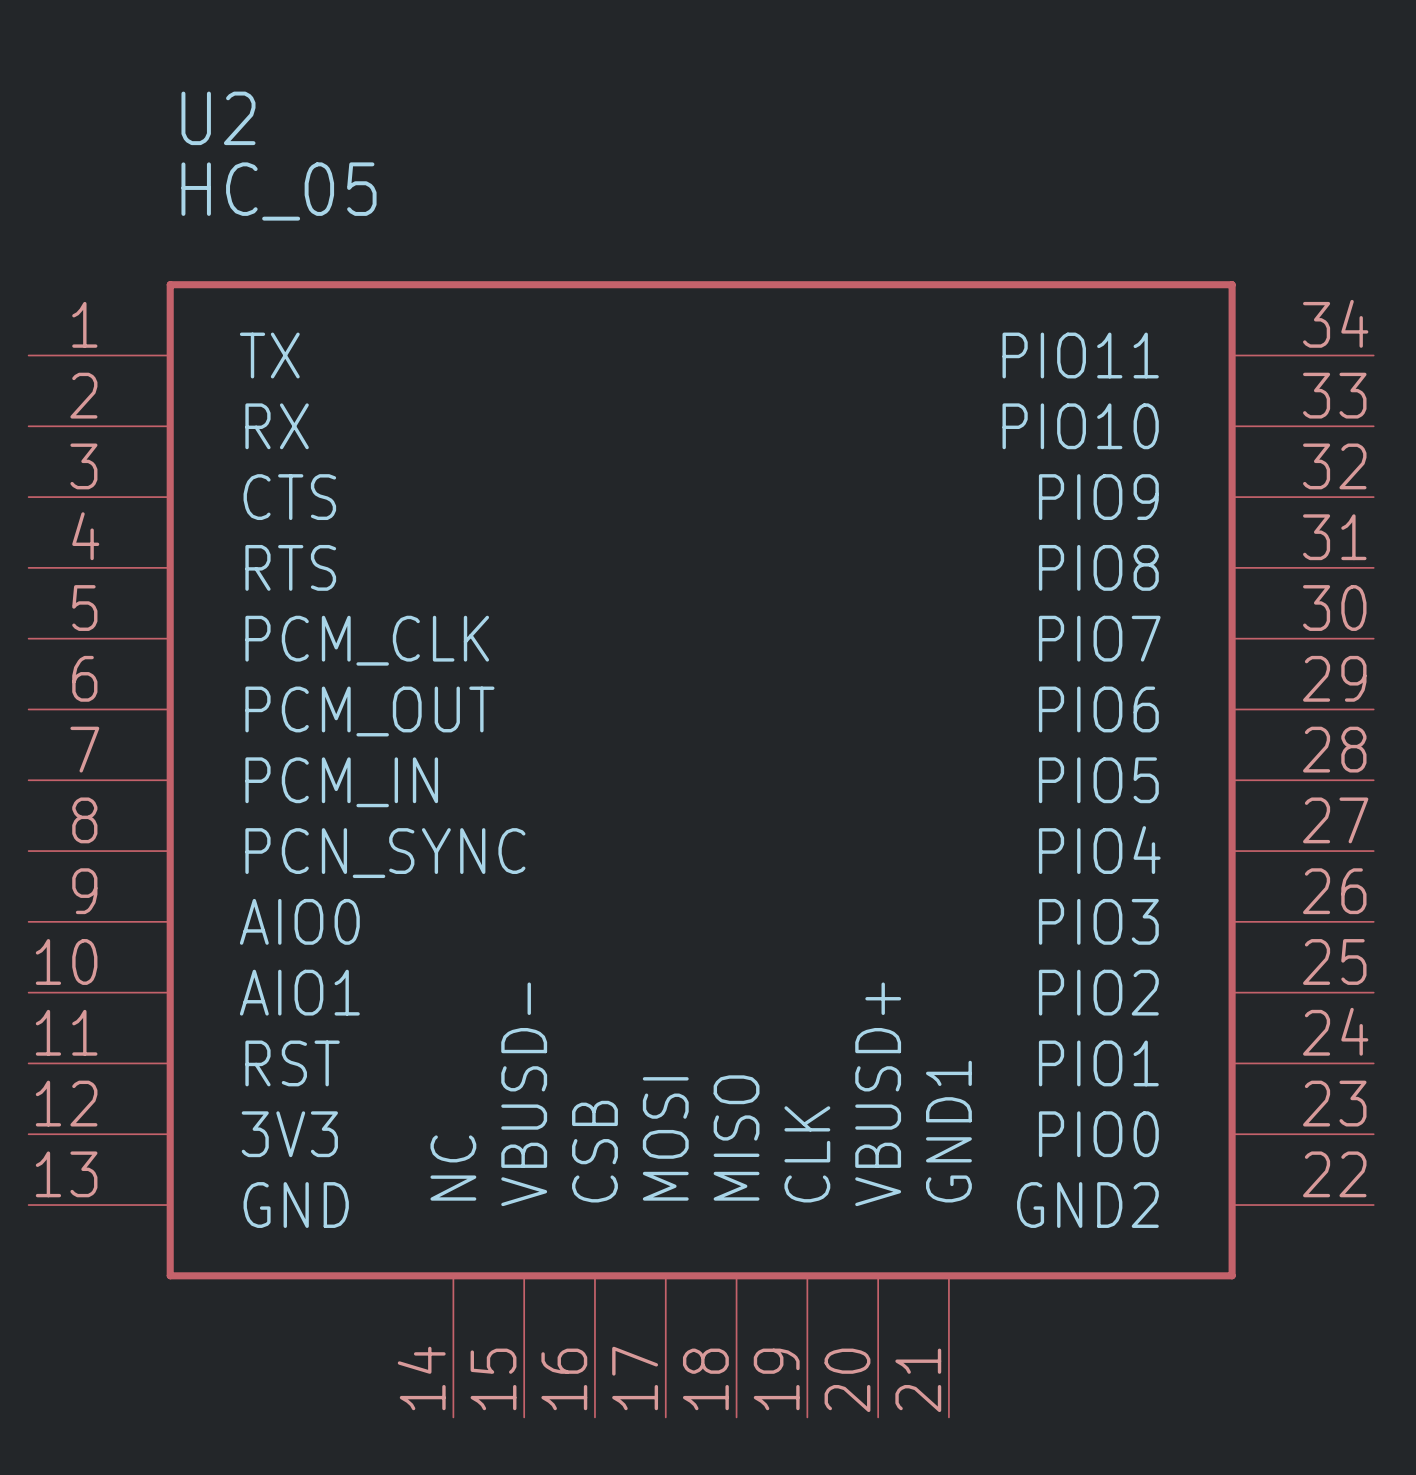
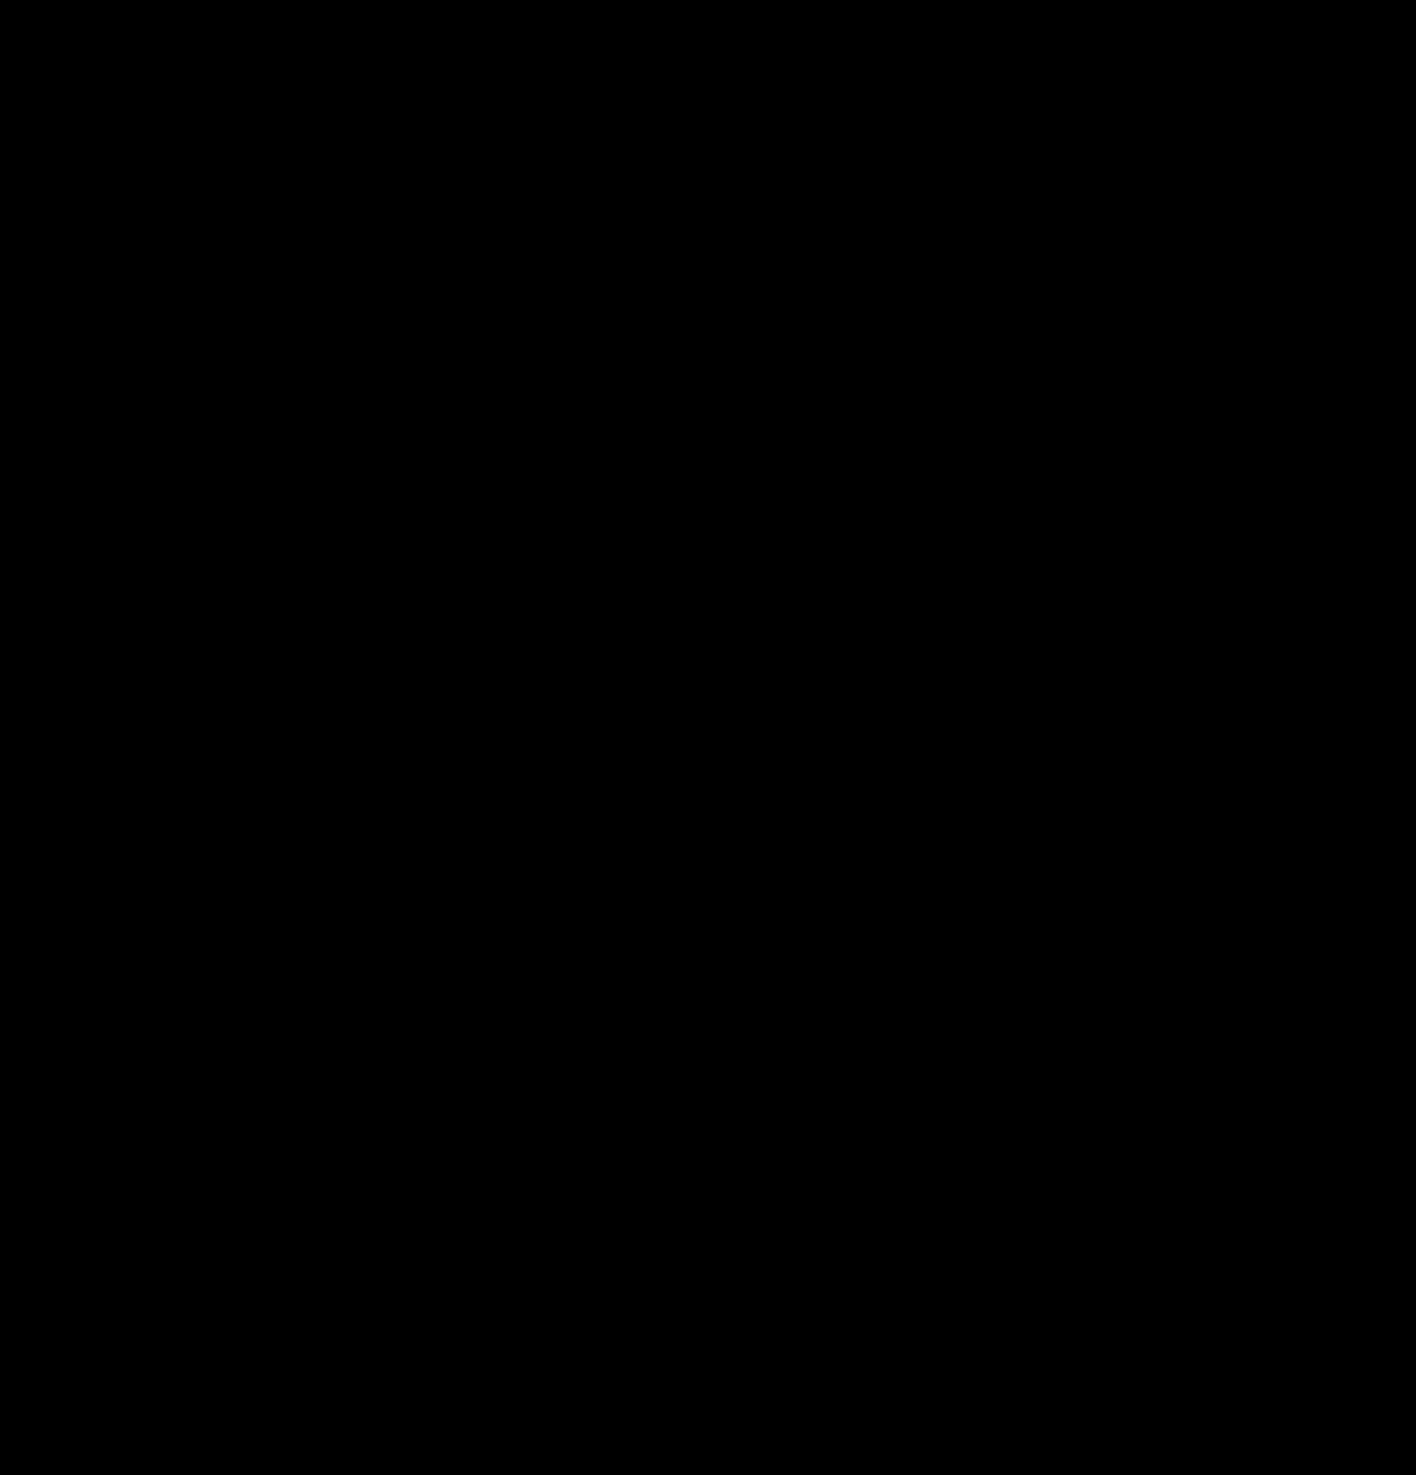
U2: HC_05 (701, 849) -> none

